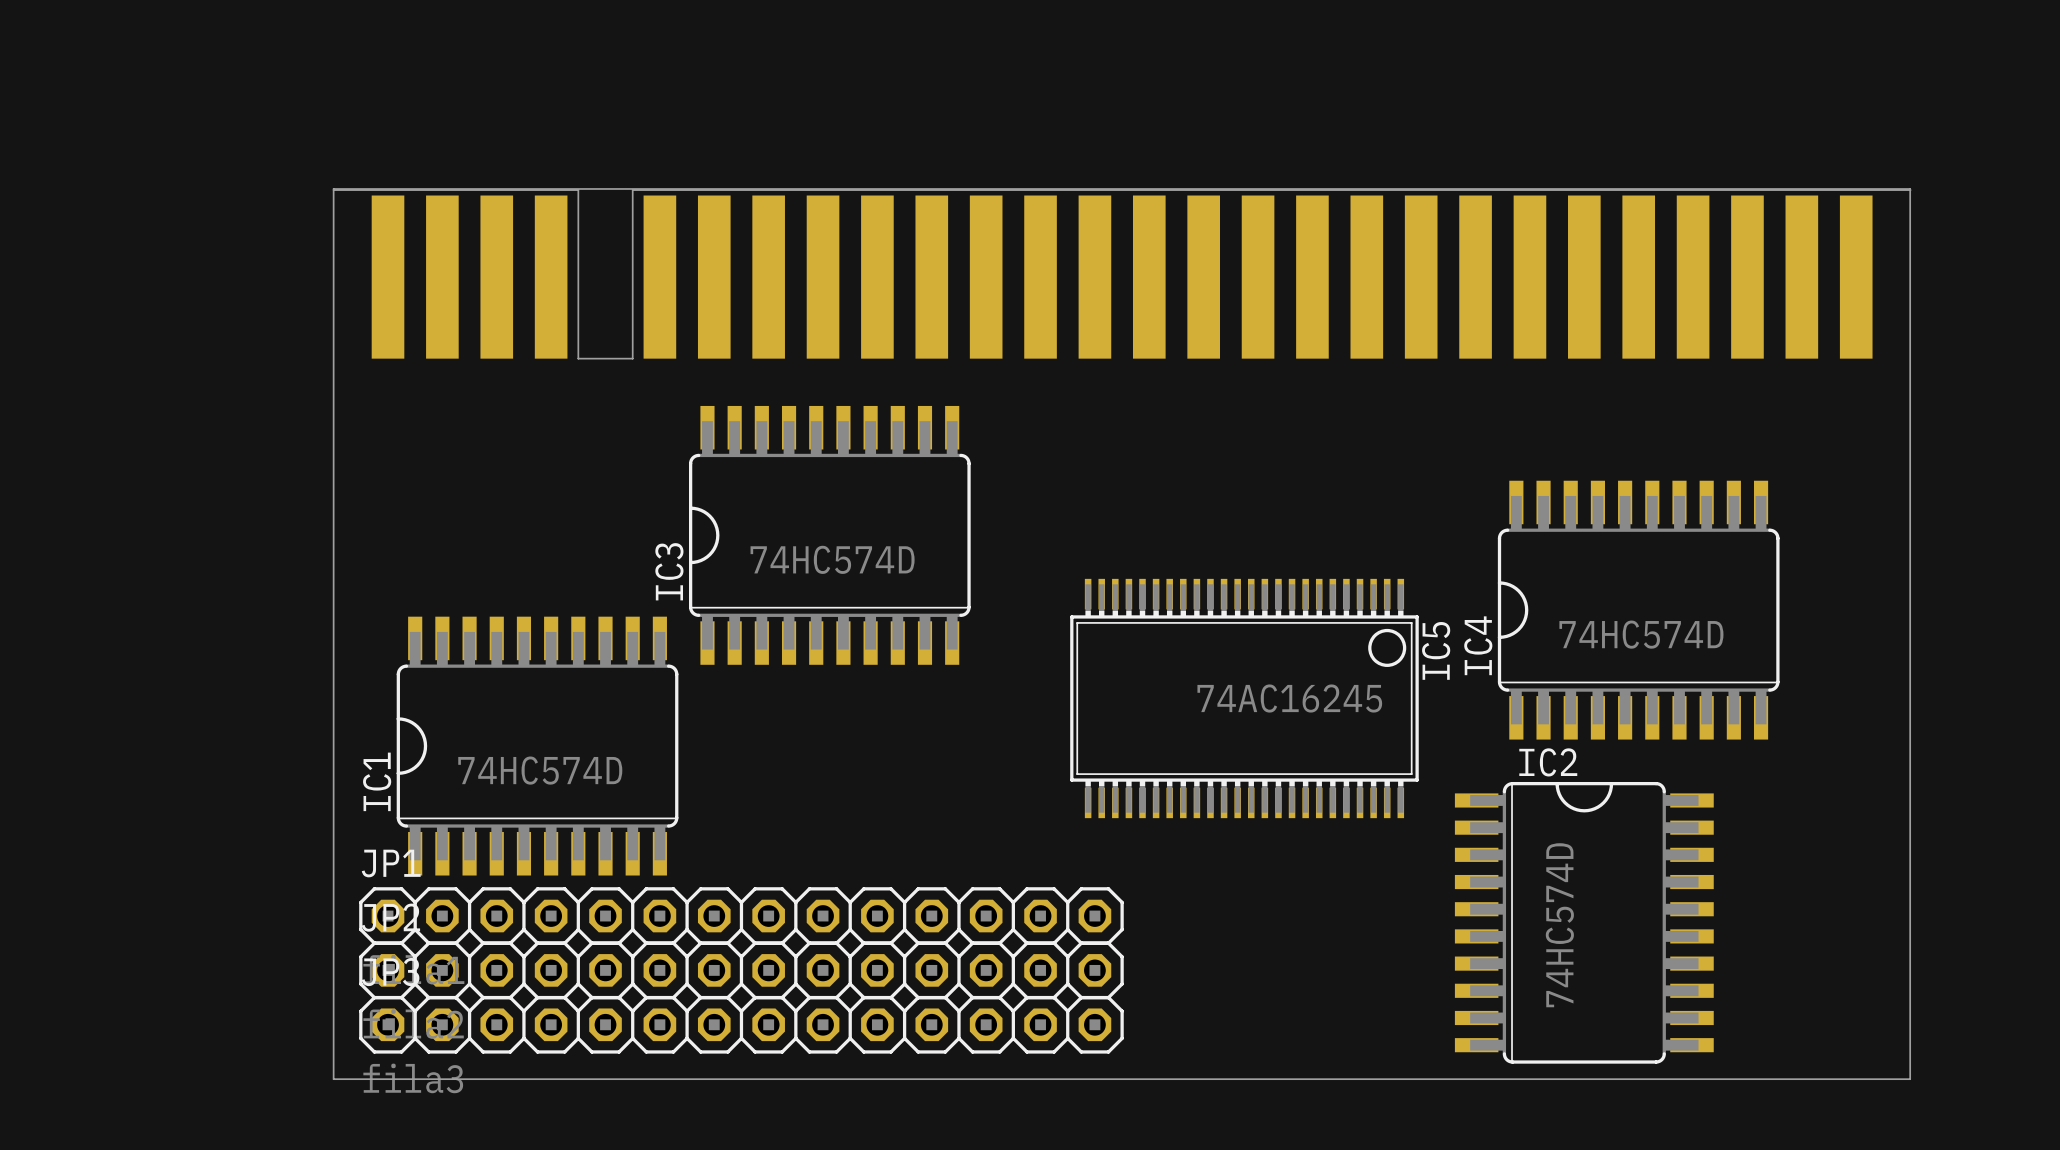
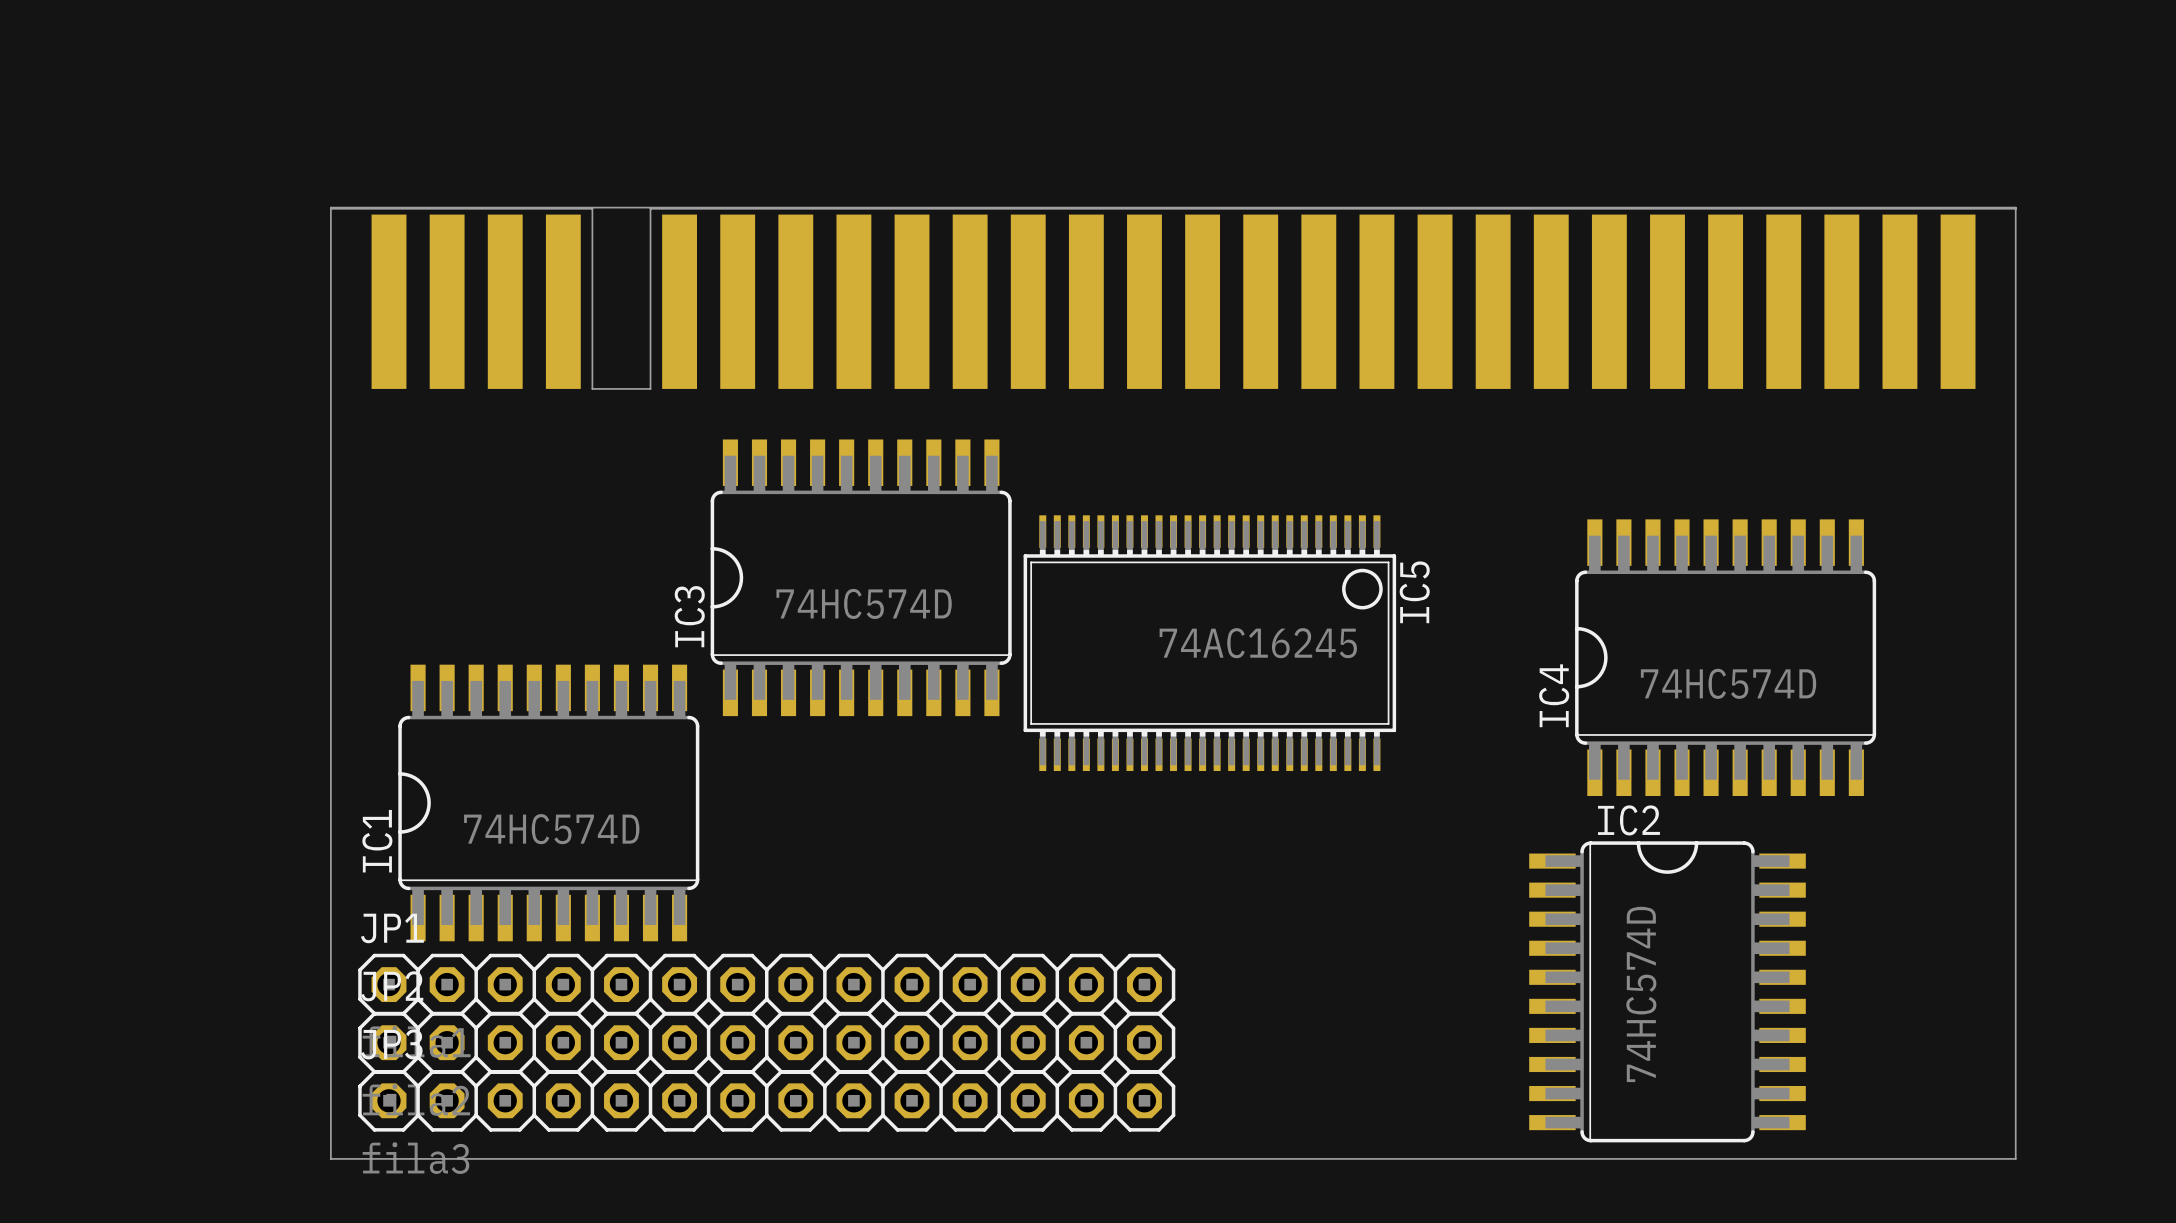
IC5 position: (1244, 698) -> (1209, 643)

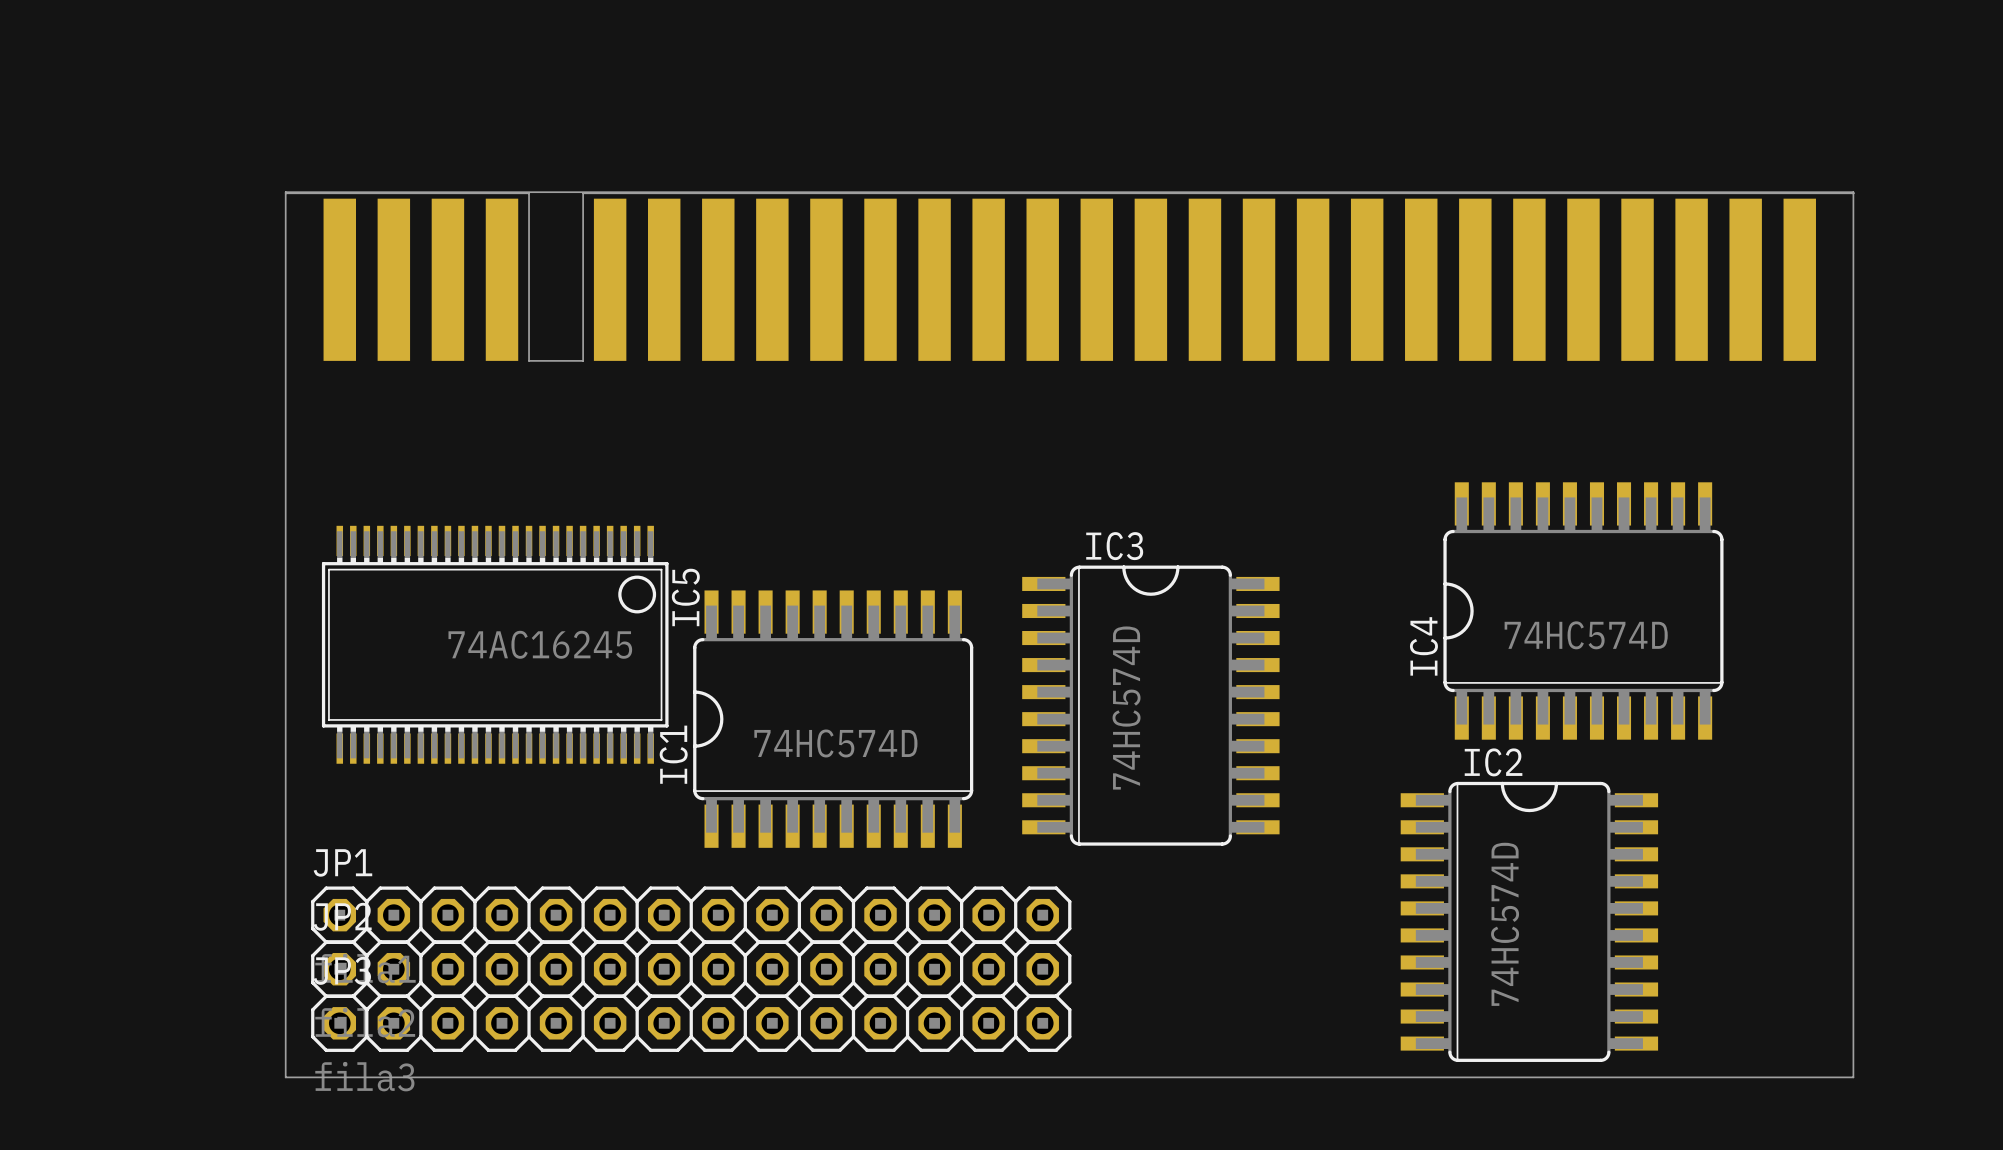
IC3 rotation: 0° (861, 577) -> 90° clockwise (1150, 705)
IC3 position: (861, 577) -> (1150, 705)
IC5 position: (1209, 643) -> (495, 644)
IC1 position: (548, 802) -> (833, 719)

